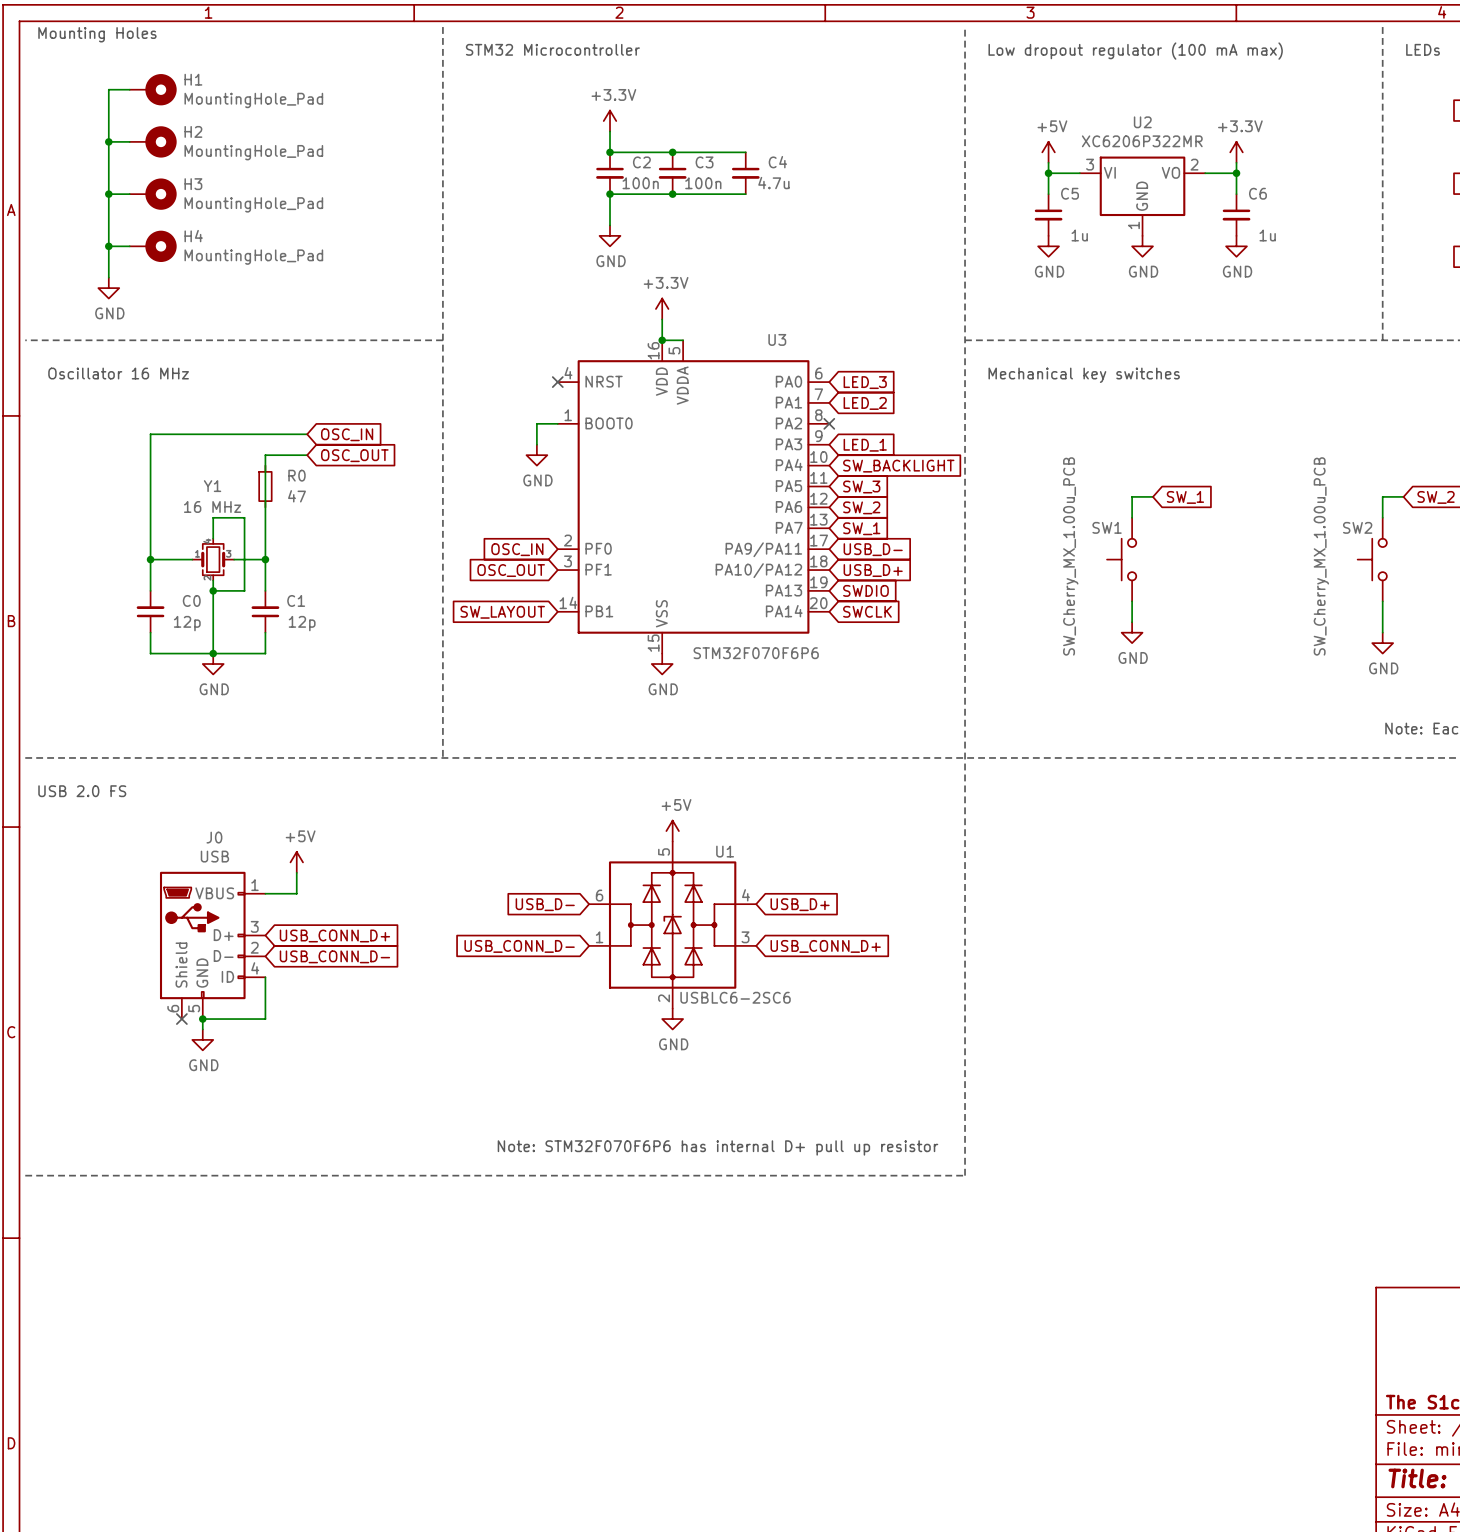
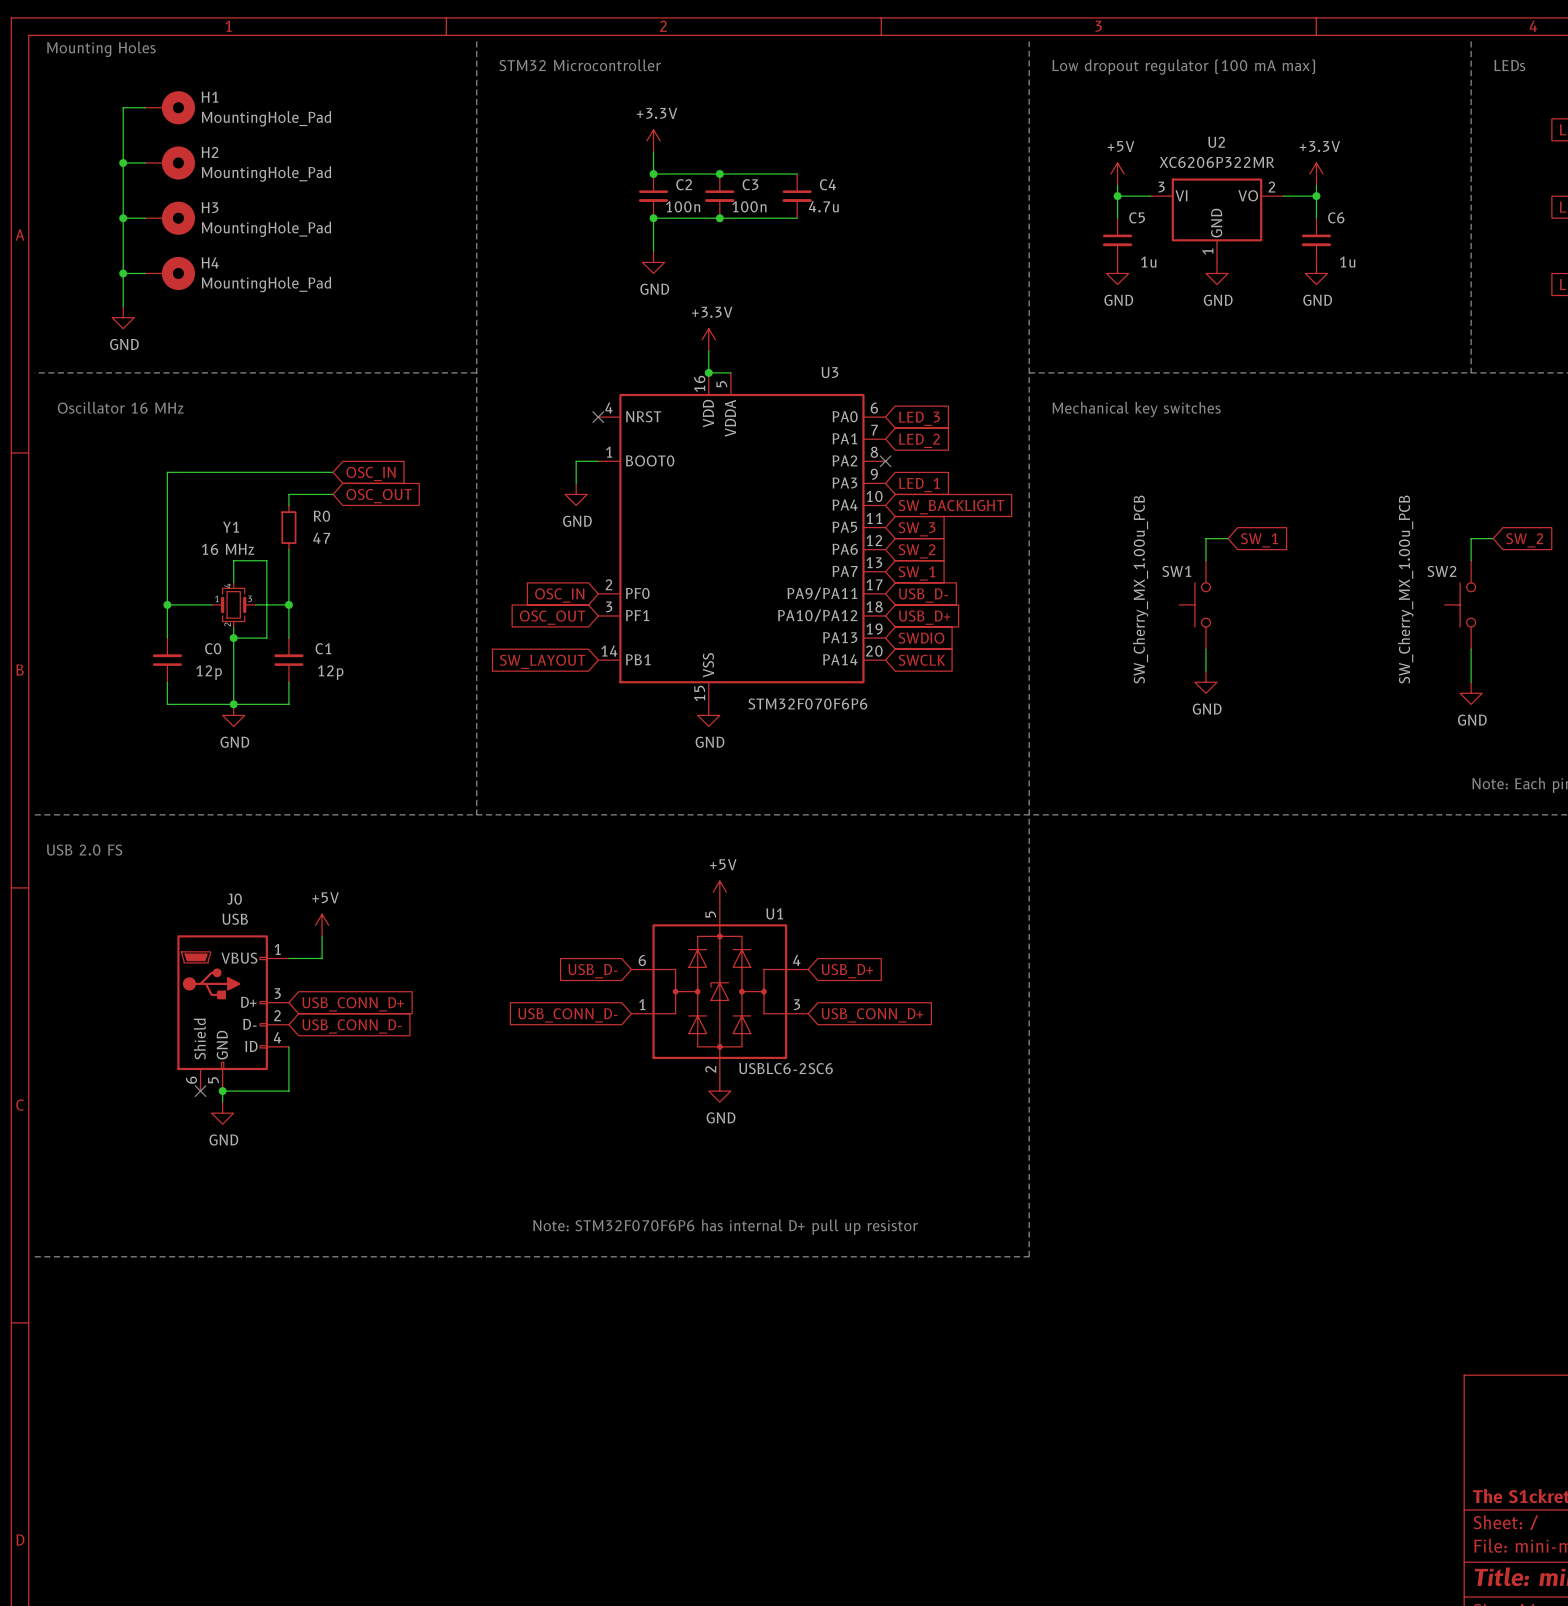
wire: (265, 465) (265, 507) -> none

